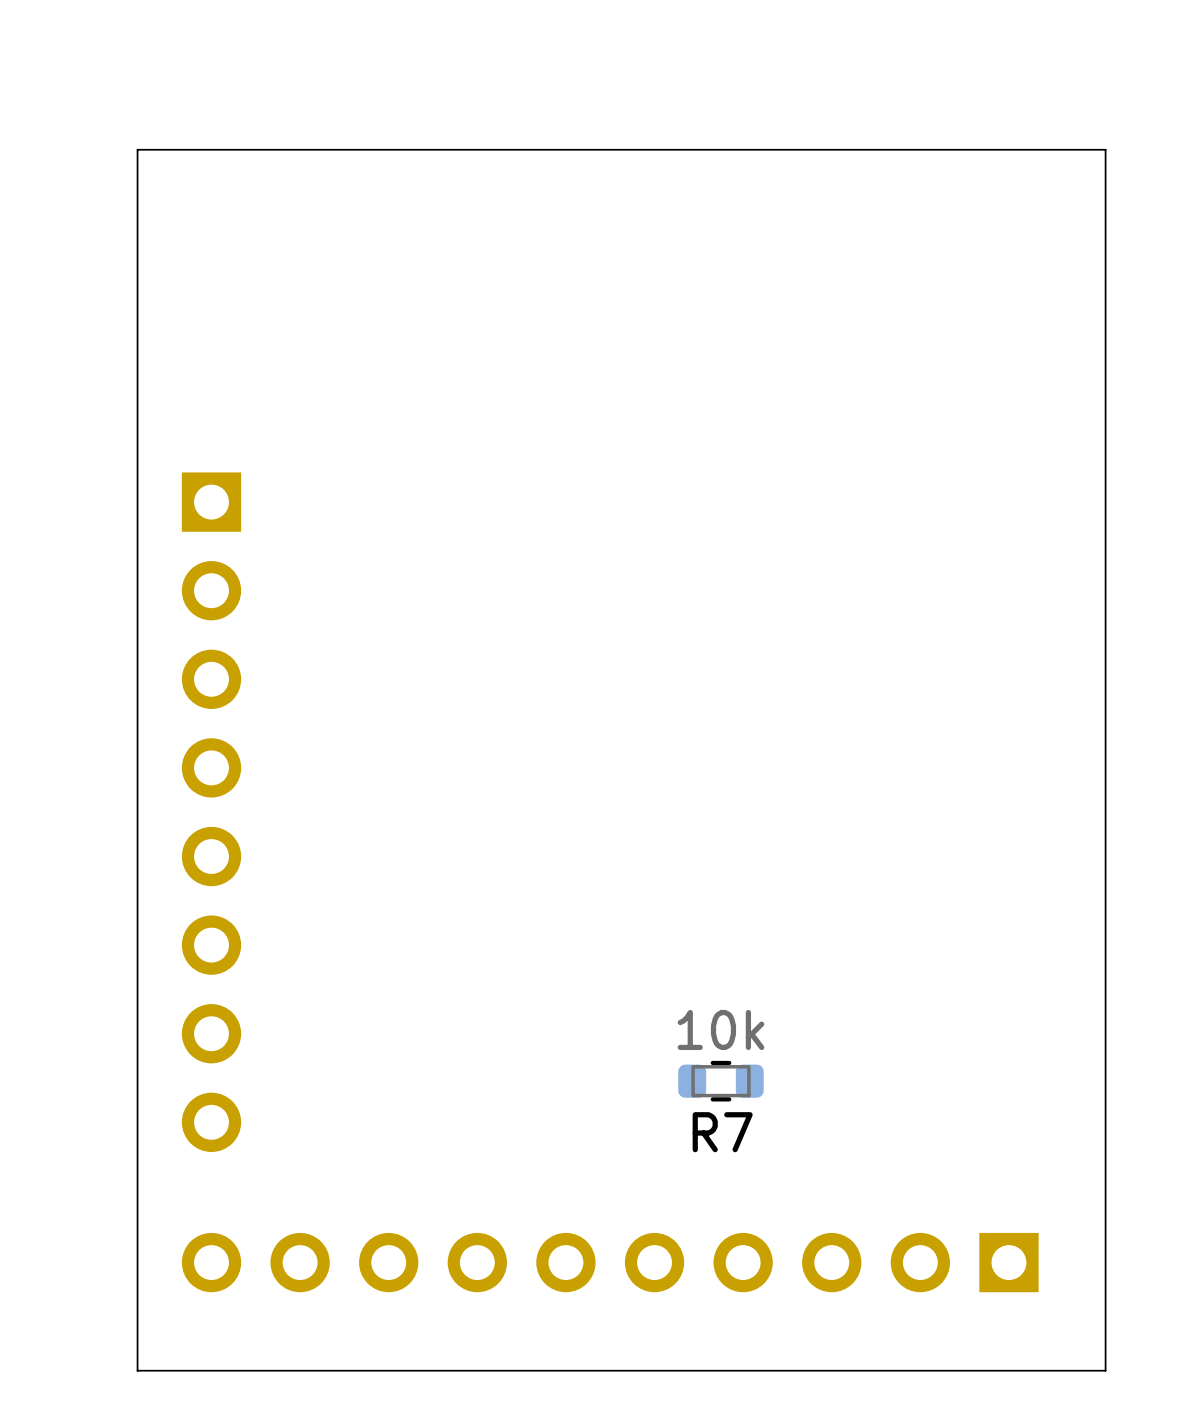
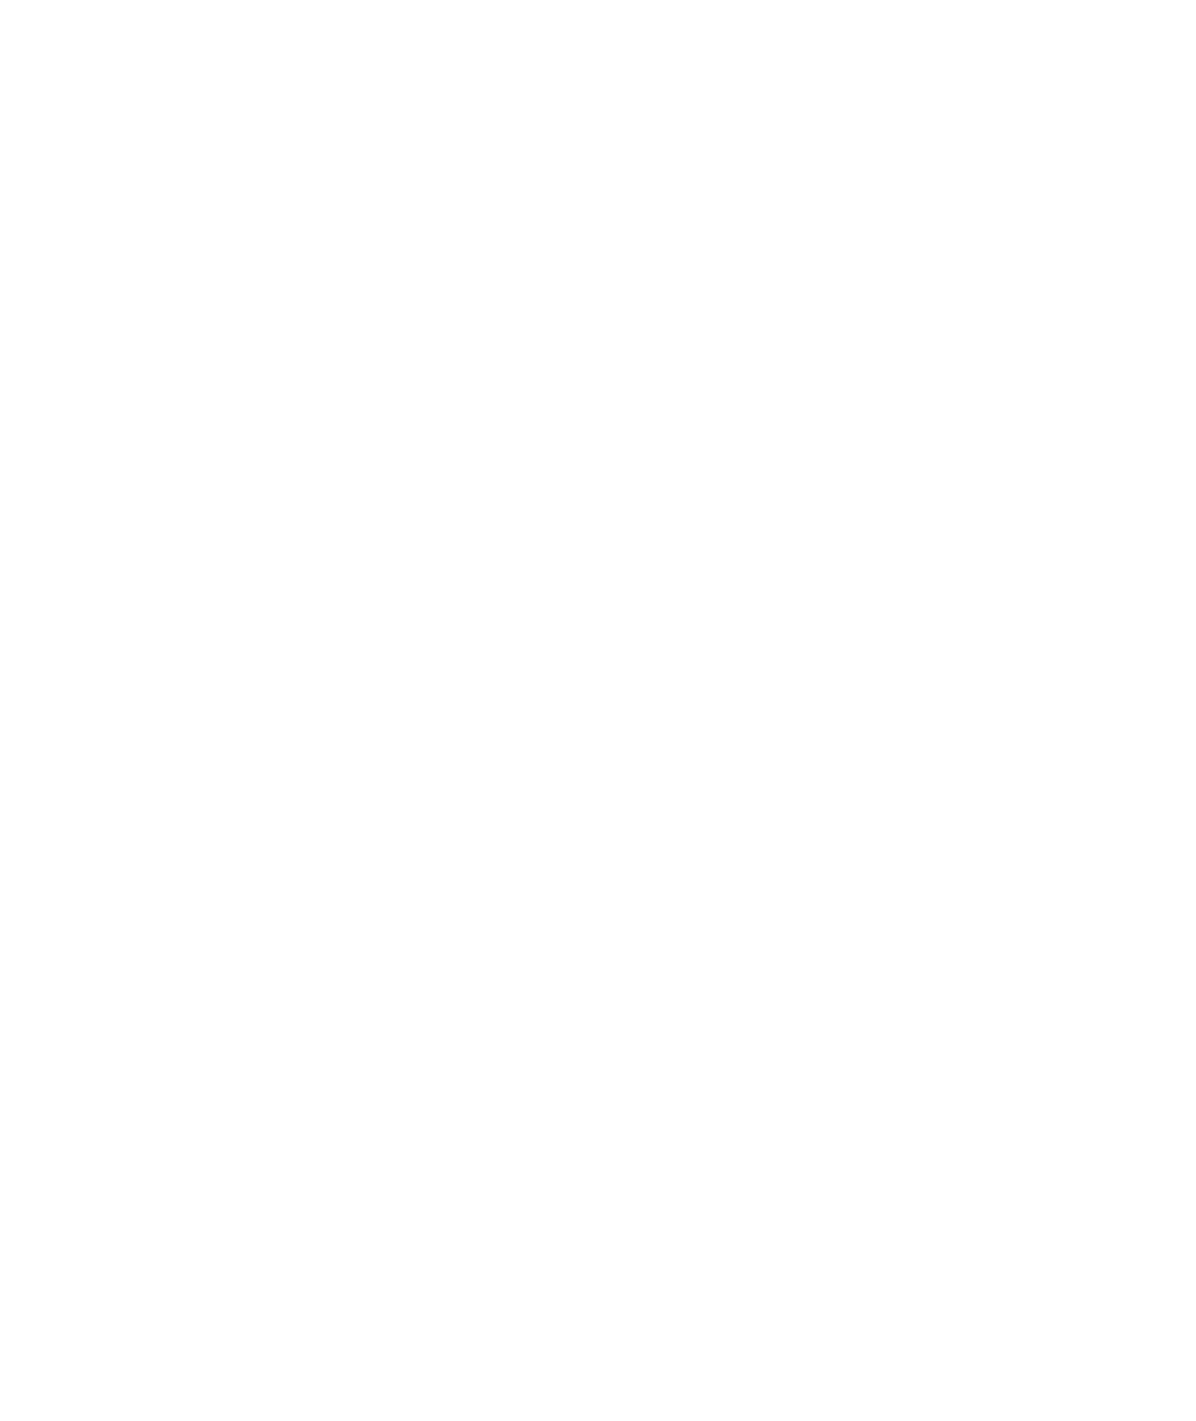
board edge: (1105, 149) (137, 149) (137, 1370) (1105, 1370) (1105, 149) -> none
part: (211, 812) -> none
R7: 10k (720, 1081) -> none
part: (610, 1262) -> none

